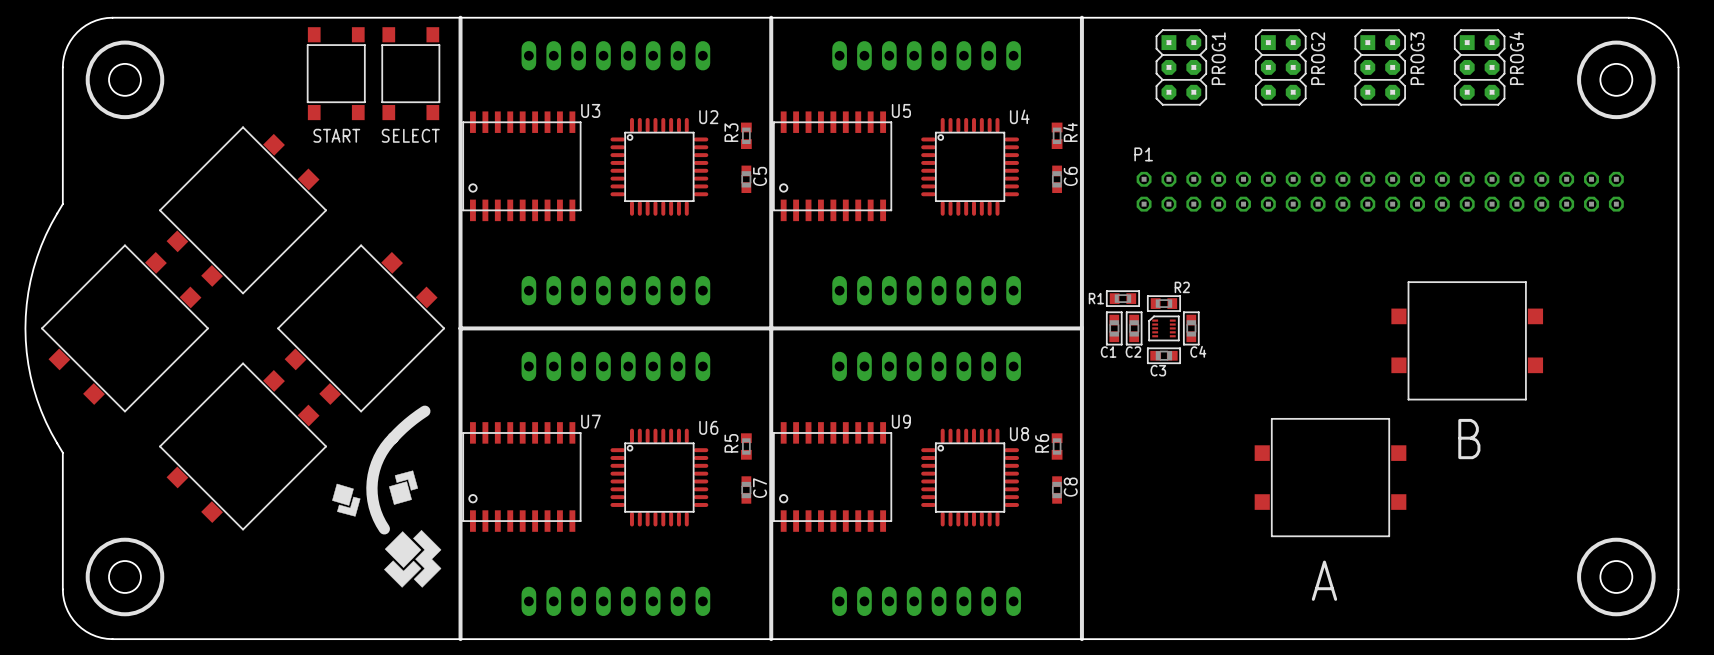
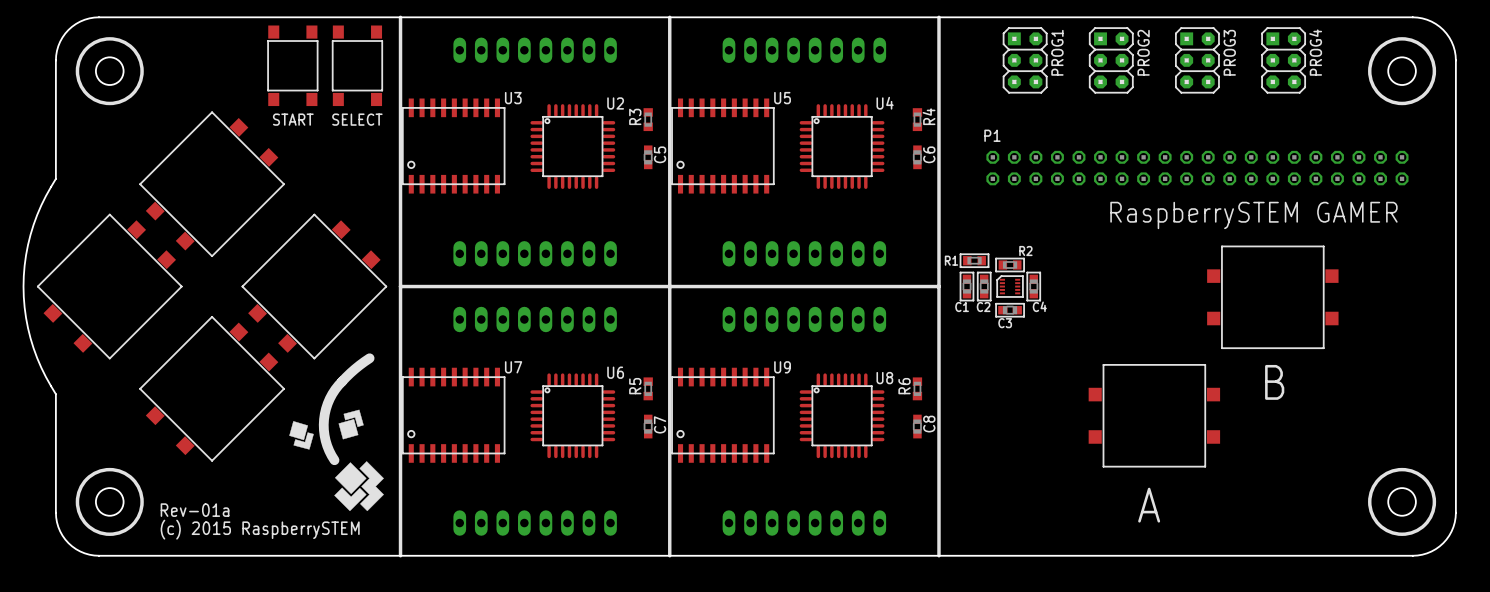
text: none -> RaspberrySTEM GAMER (1253, 215)
text: none -> Rev-01a (195, 510)
text: none -> (c) 2015 RaspberrySTEM (260, 529)

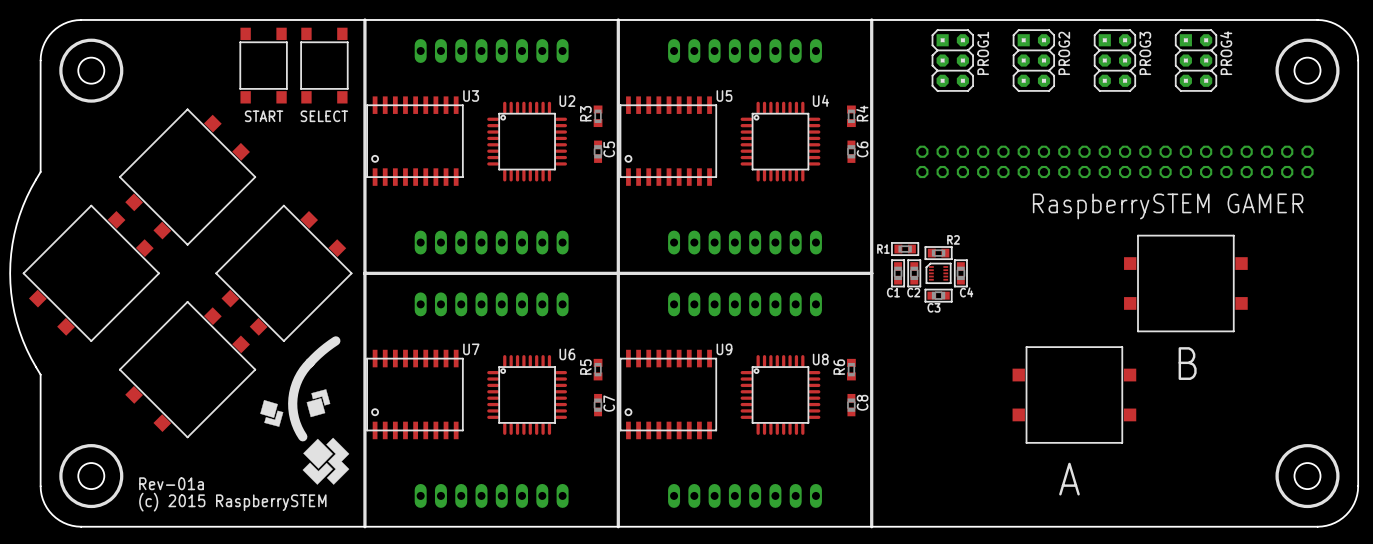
P1 side: top (1197, 168) -> bottom (1114, 161)

